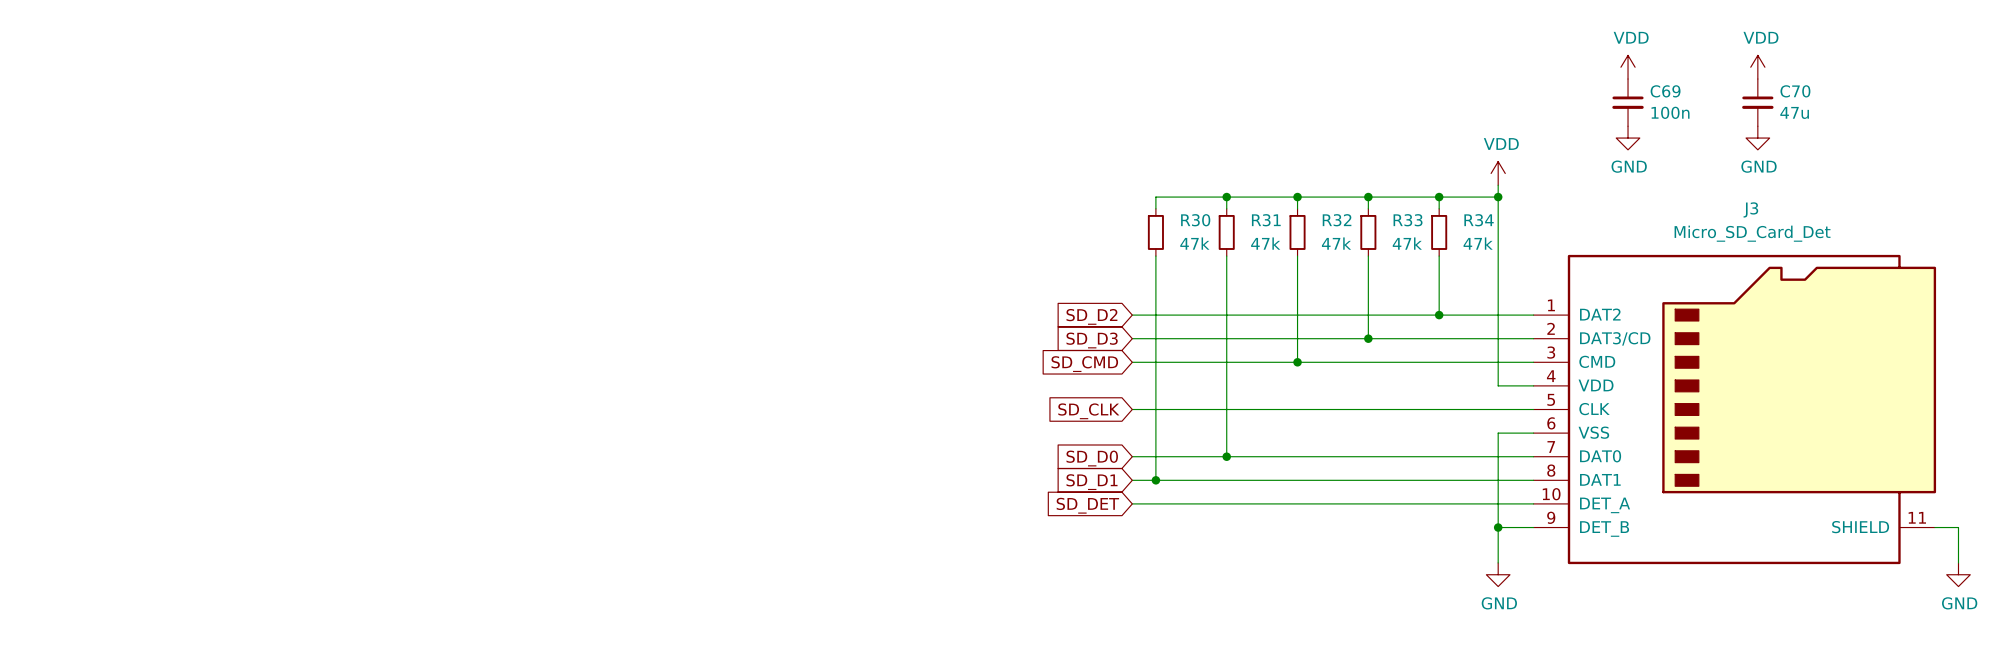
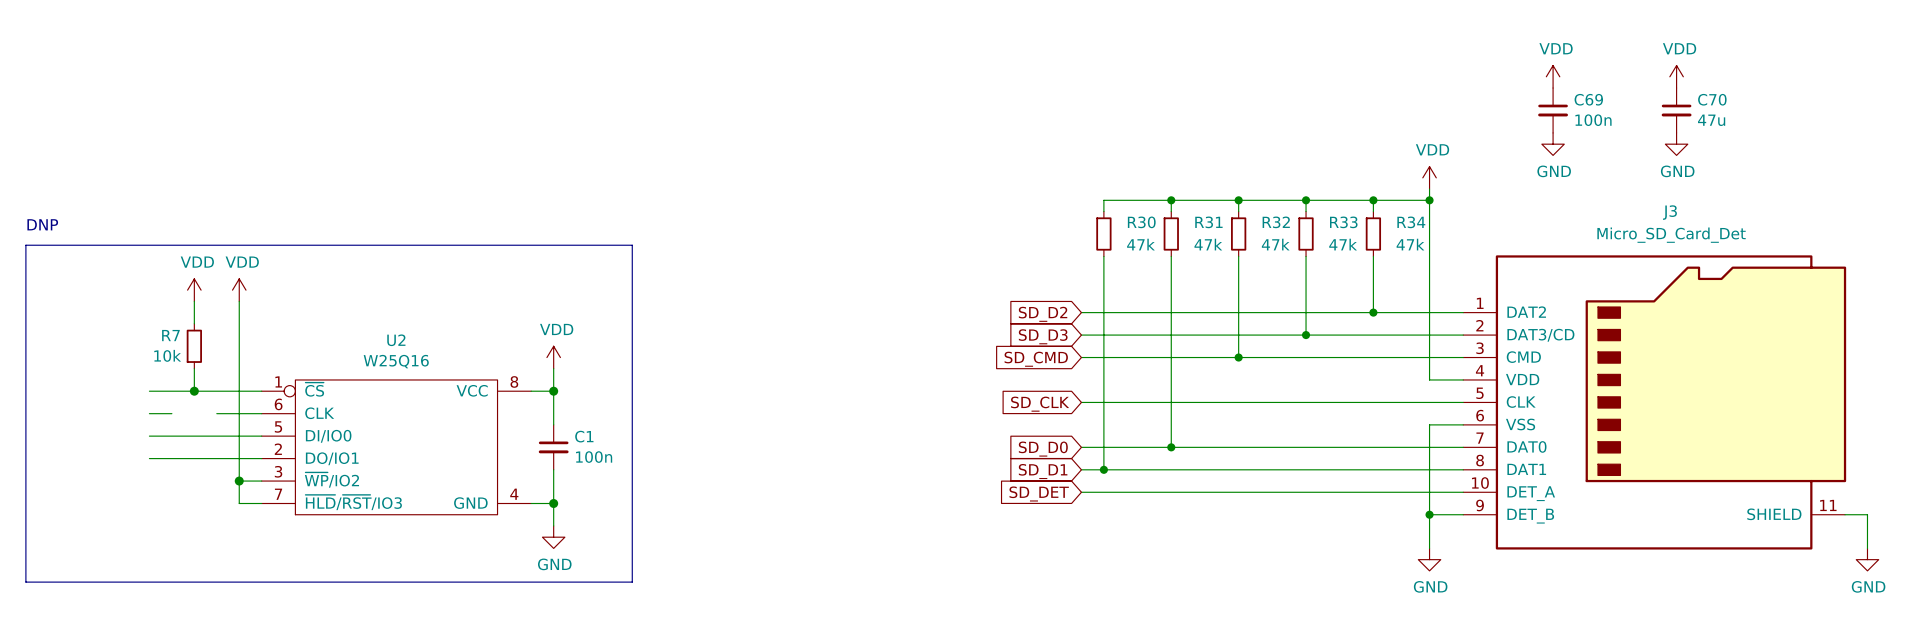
text: none -> DNP (42, 224)
line: none -> (25, 245) (632, 245) (632, 582) (25, 582) (25, 245)
power symbol: none -> VDD (194, 290)
power symbol: none -> VDD (239, 290)
wire: none -> (194, 301) (194, 323)
wire: none -> (239, 301) (239, 503) (261, 503)
R7: none -> 10k (194, 346)
power symbol: none -> VDD (553, 357)
wire: none -> (194, 368) (194, 391)
wire: none -> (553, 368) (553, 424)
wire: none -> (149, 391) (261, 391)
junction: none -> (194, 391)
wire: none -> (531, 391) (553, 391)
junction: none -> (553, 391)
wire: none -> (149, 413) (171, 413)
wire: none -> (216, 413) (261, 413)
wire: none -> (149, 436) (261, 436)
U2: none -> W25Q16 (396, 447)
C1: none -> 100n (553, 447)
wire: none -> (149, 458) (261, 458)
wire: none -> (553, 469) (553, 525)
wire: none -> (239, 481) (261, 481)
junction: none -> (239, 481)
wire: none -> (531, 503) (553, 503)
junction: none -> (553, 503)
power symbol: none -> GND (553, 537)

